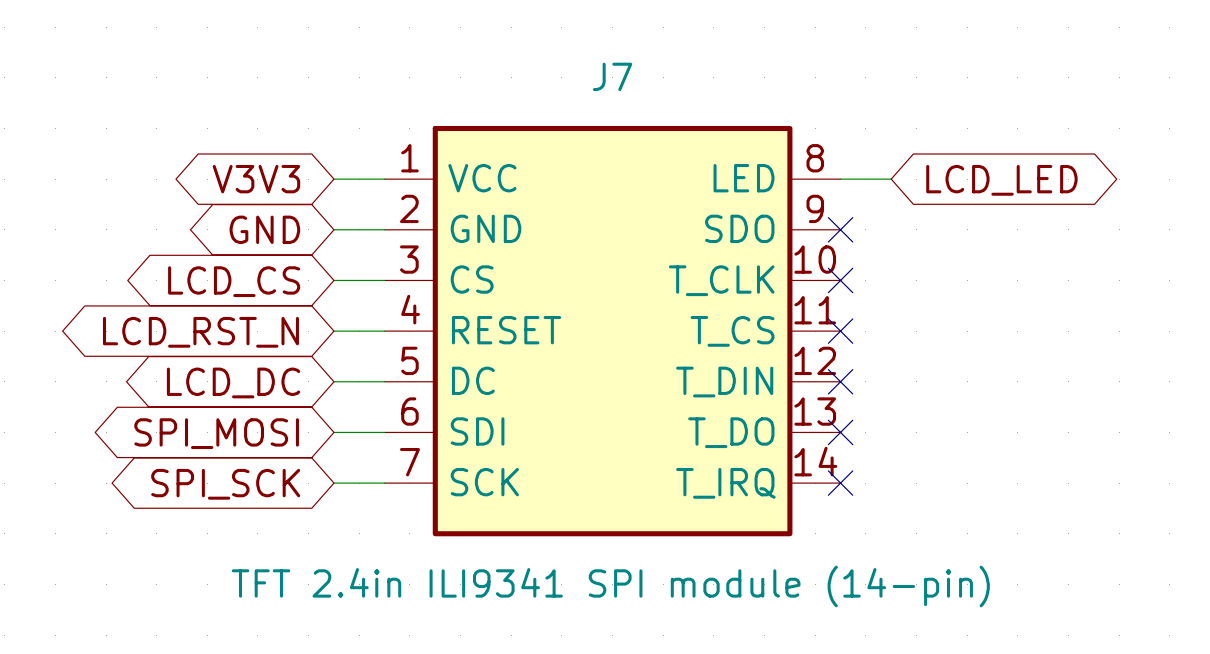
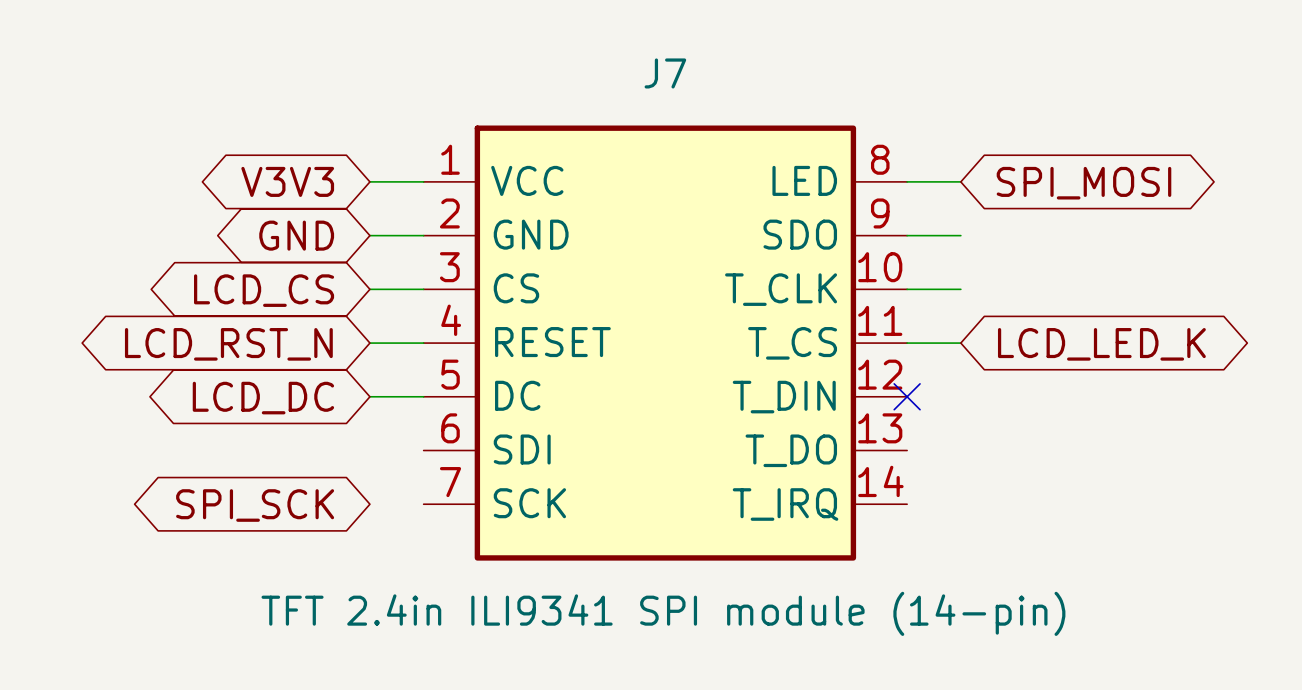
global label: LCD_LED (1001, 180) -> SPI_MOSI (1083, 183)
wire: none -> (907, 235) (960, 235)
no-connect mark: (840, 229) -> none
wire: none -> (907, 289) (960, 289)
no-connect mark: (840, 280) -> none
wire: none -> (907, 343) (960, 343)
no-connect mark: (840, 331) -> none
global label: none -> LCD_LED_K (1101, 344)
wire: (333, 432) (384, 432) -> none
no-connect mark: (840, 432) -> none
global label: SPI_MOSI (216, 433) -> none
wire: (333, 483) (384, 483) -> none
no-connect mark: (840, 483) -> none

